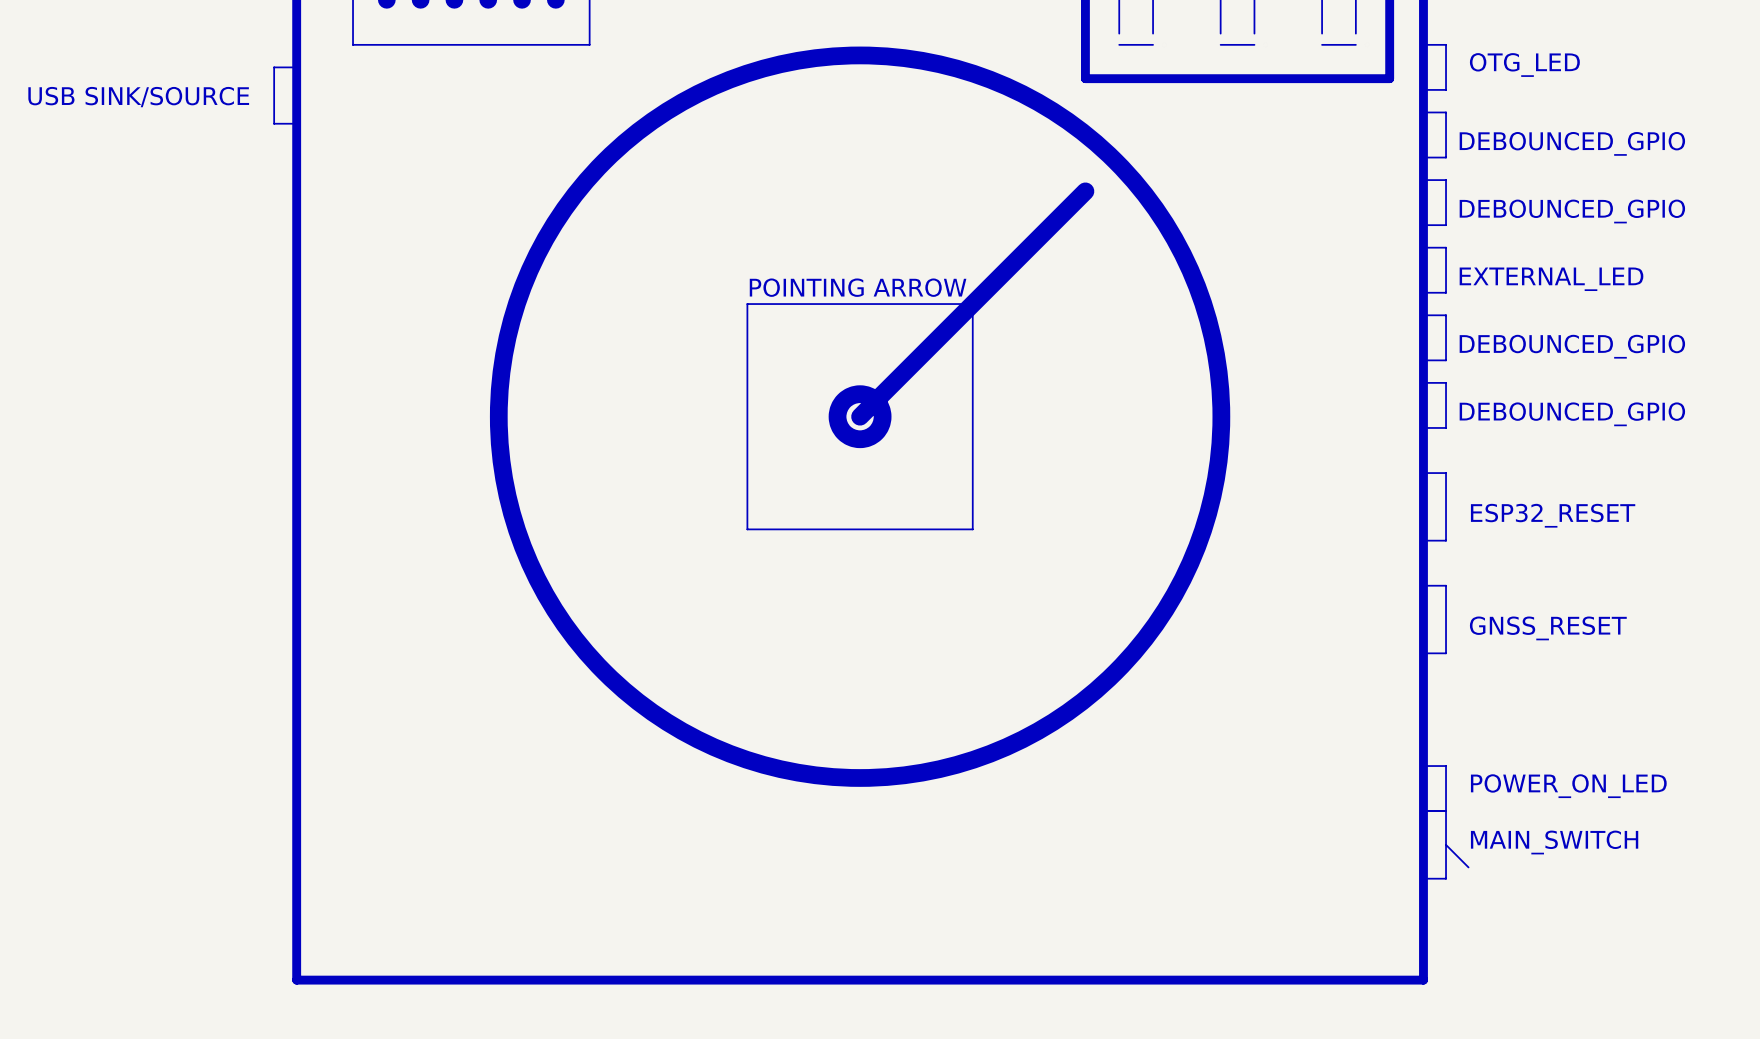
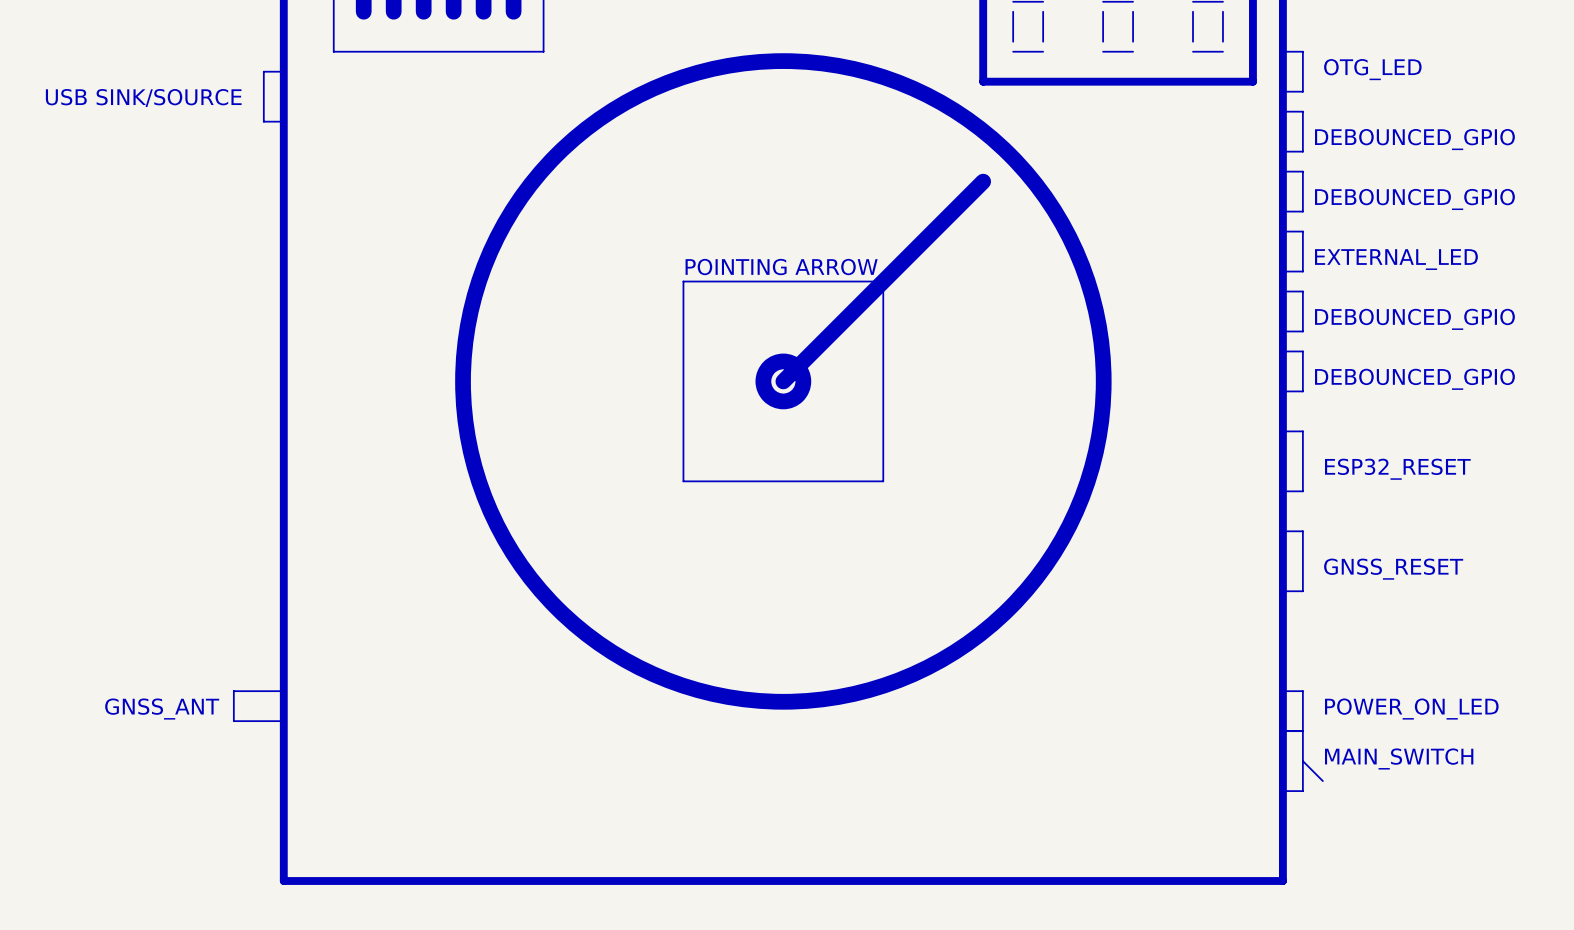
line: none -> (233, 691) (283, 691) (283, 721) (233, 721) (233, 691)
text: none -> GNSS_ANT (162, 709)

